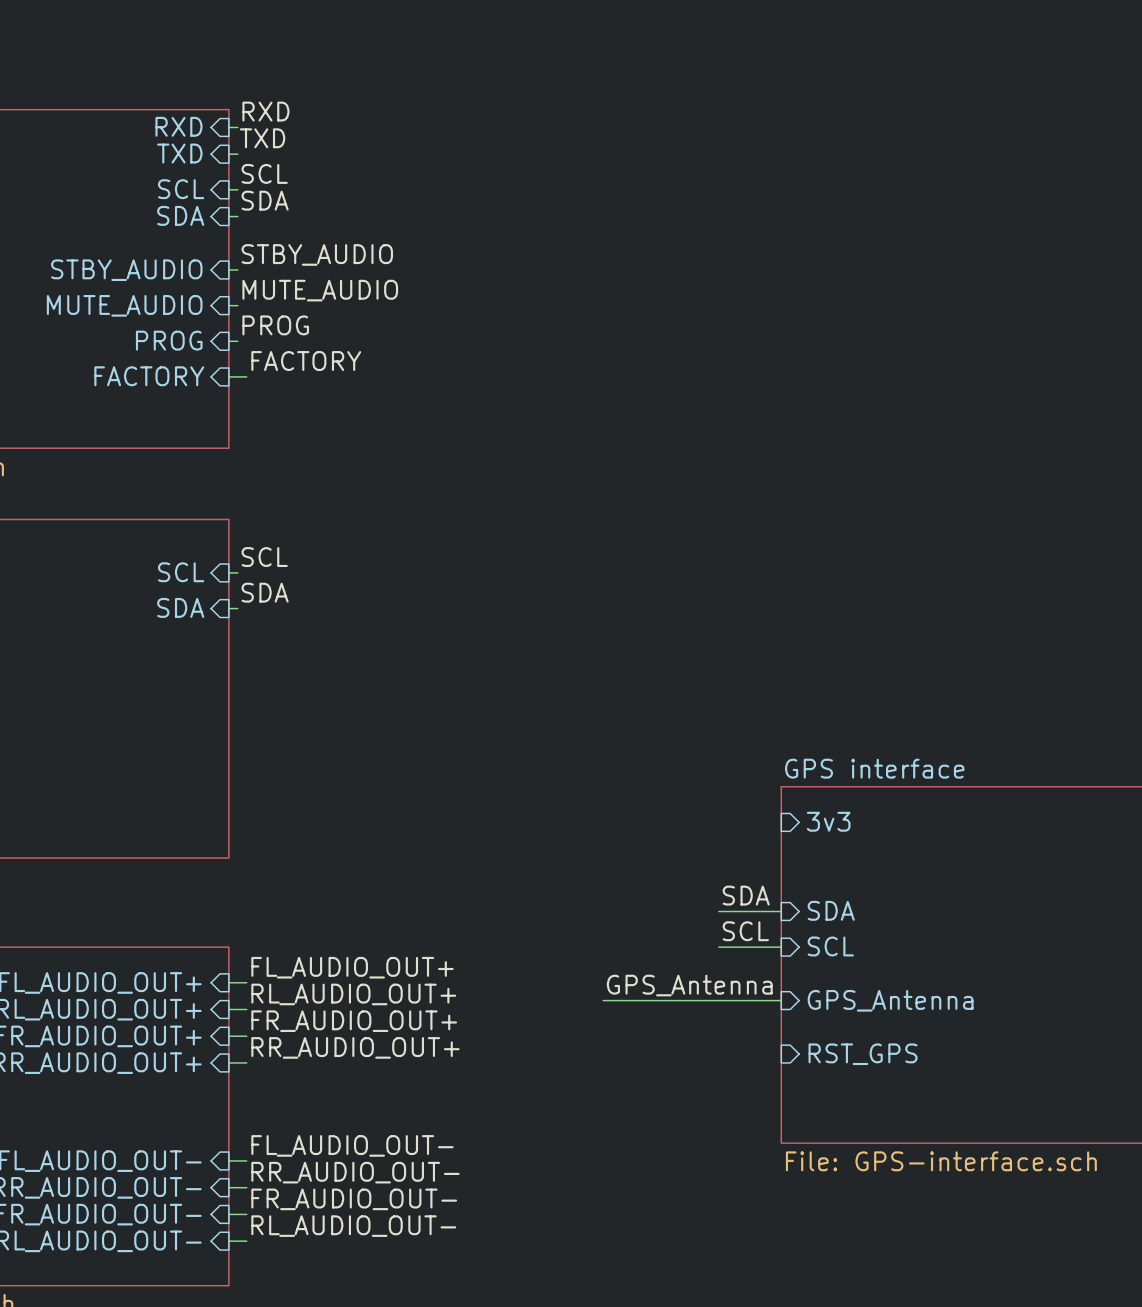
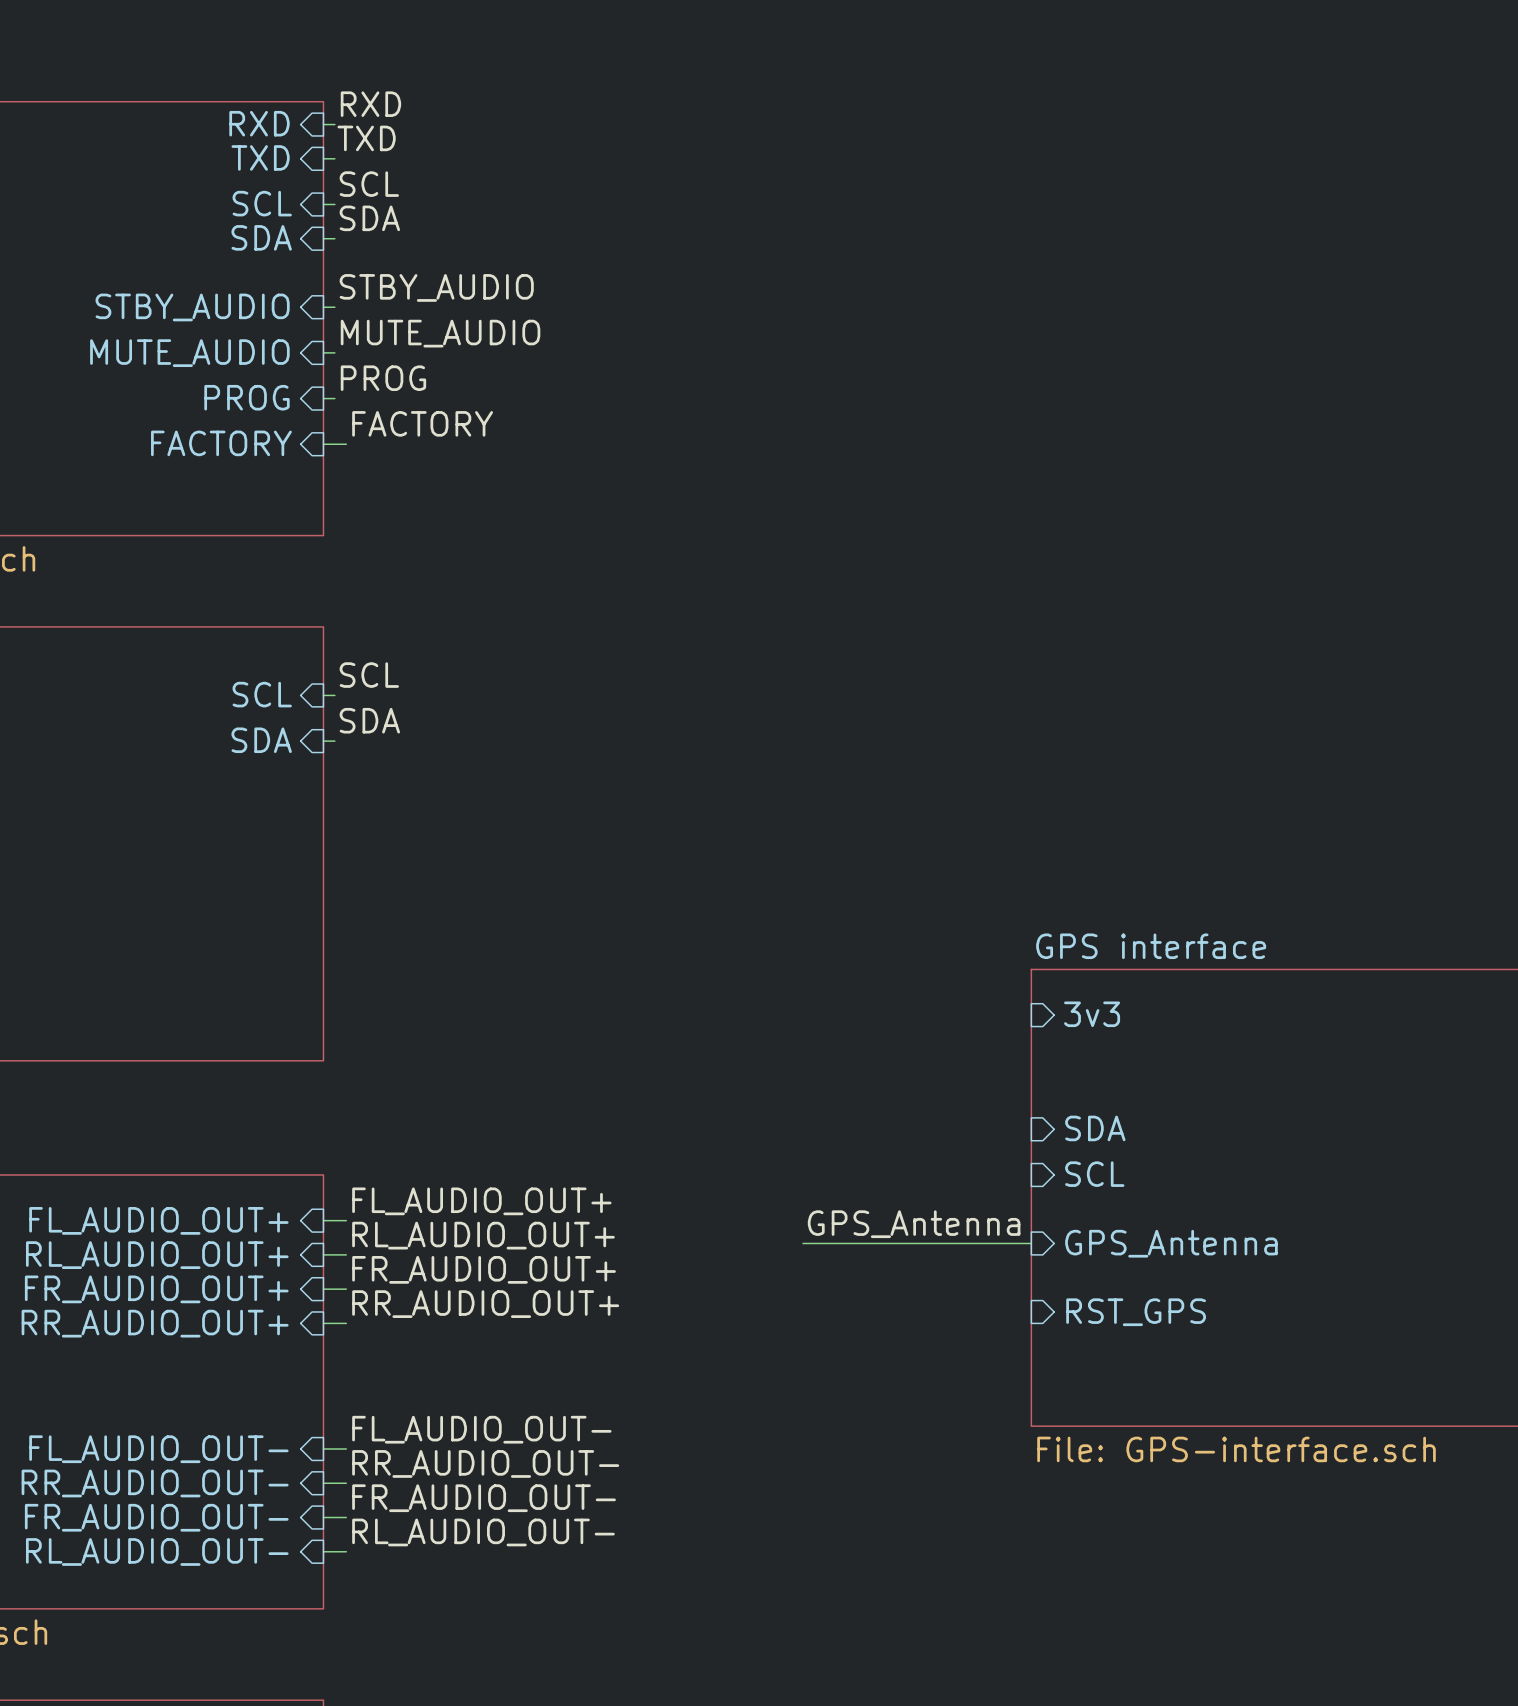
label: SDA (746, 895) -> none
wire: (718, 911) (781, 911) -> none
label: SCL (745, 931) -> none
wire: (718, 947) (781, 947) -> none

